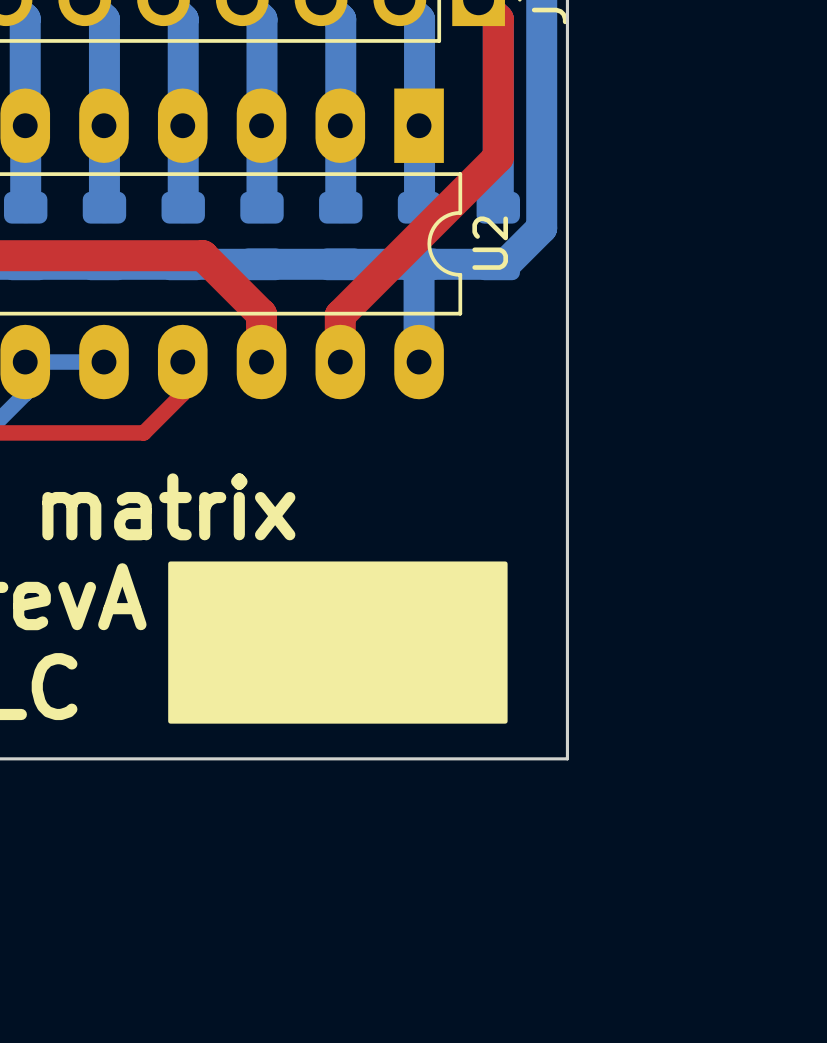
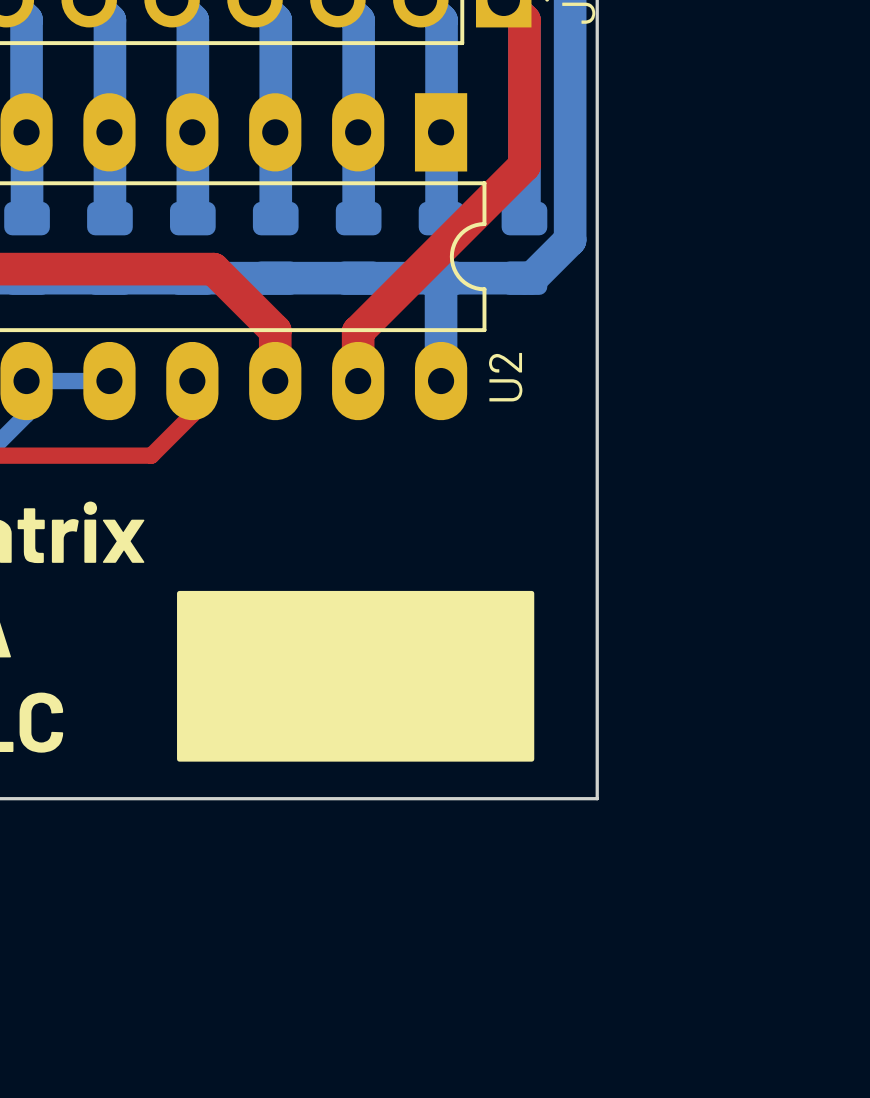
U2 name position: U2 (490, 243) -> U2 (505, 377)

